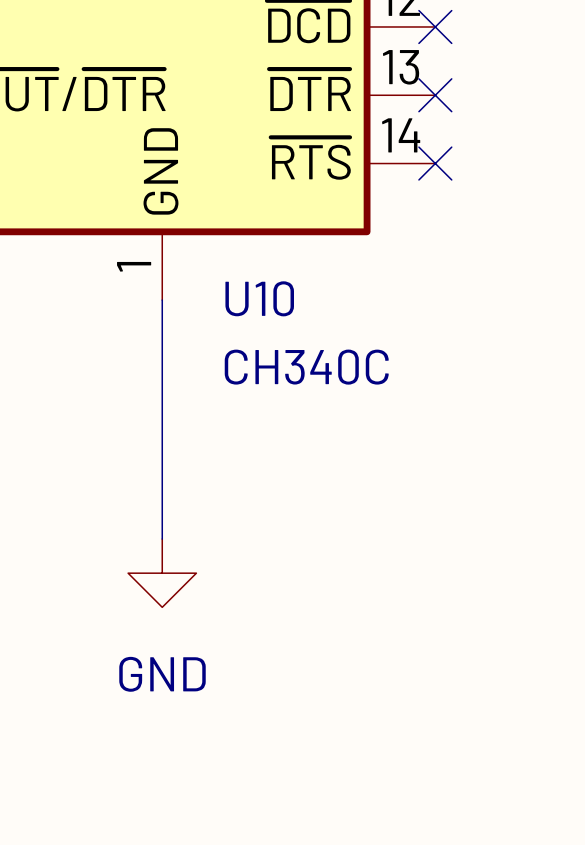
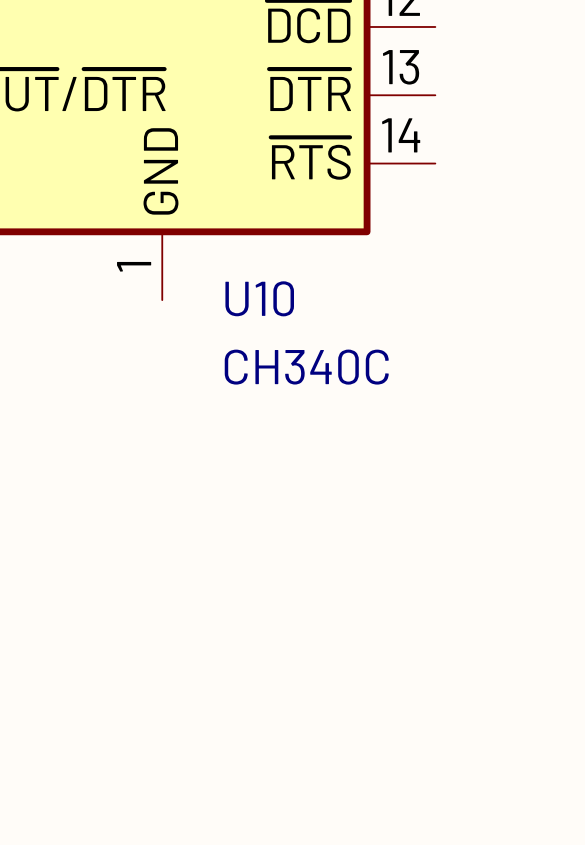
no-connect mark: (435, 26) -> none
no-connect mark: (435, 95) -> none
no-connect mark: (435, 163) -> none
wire: (162, 300) (162, 539) -> none
power symbol: GND (162, 573) -> none

